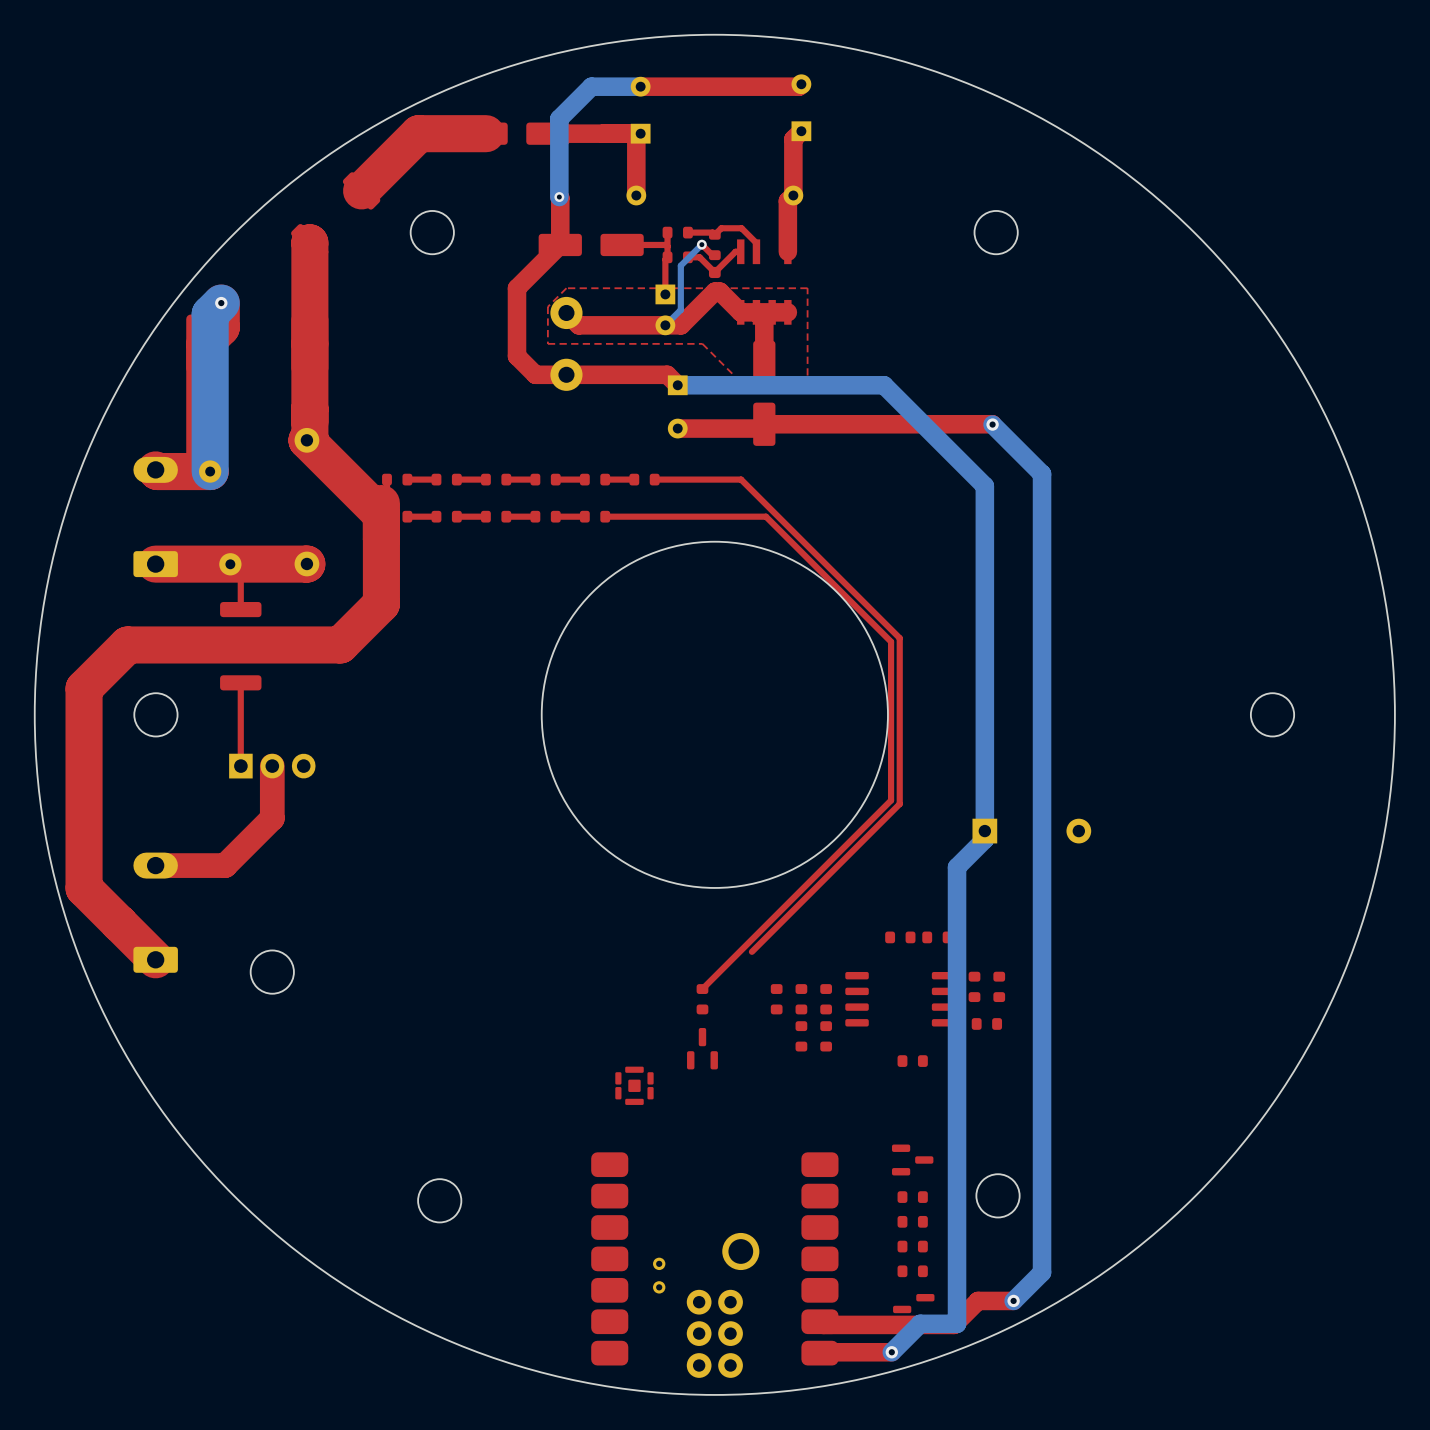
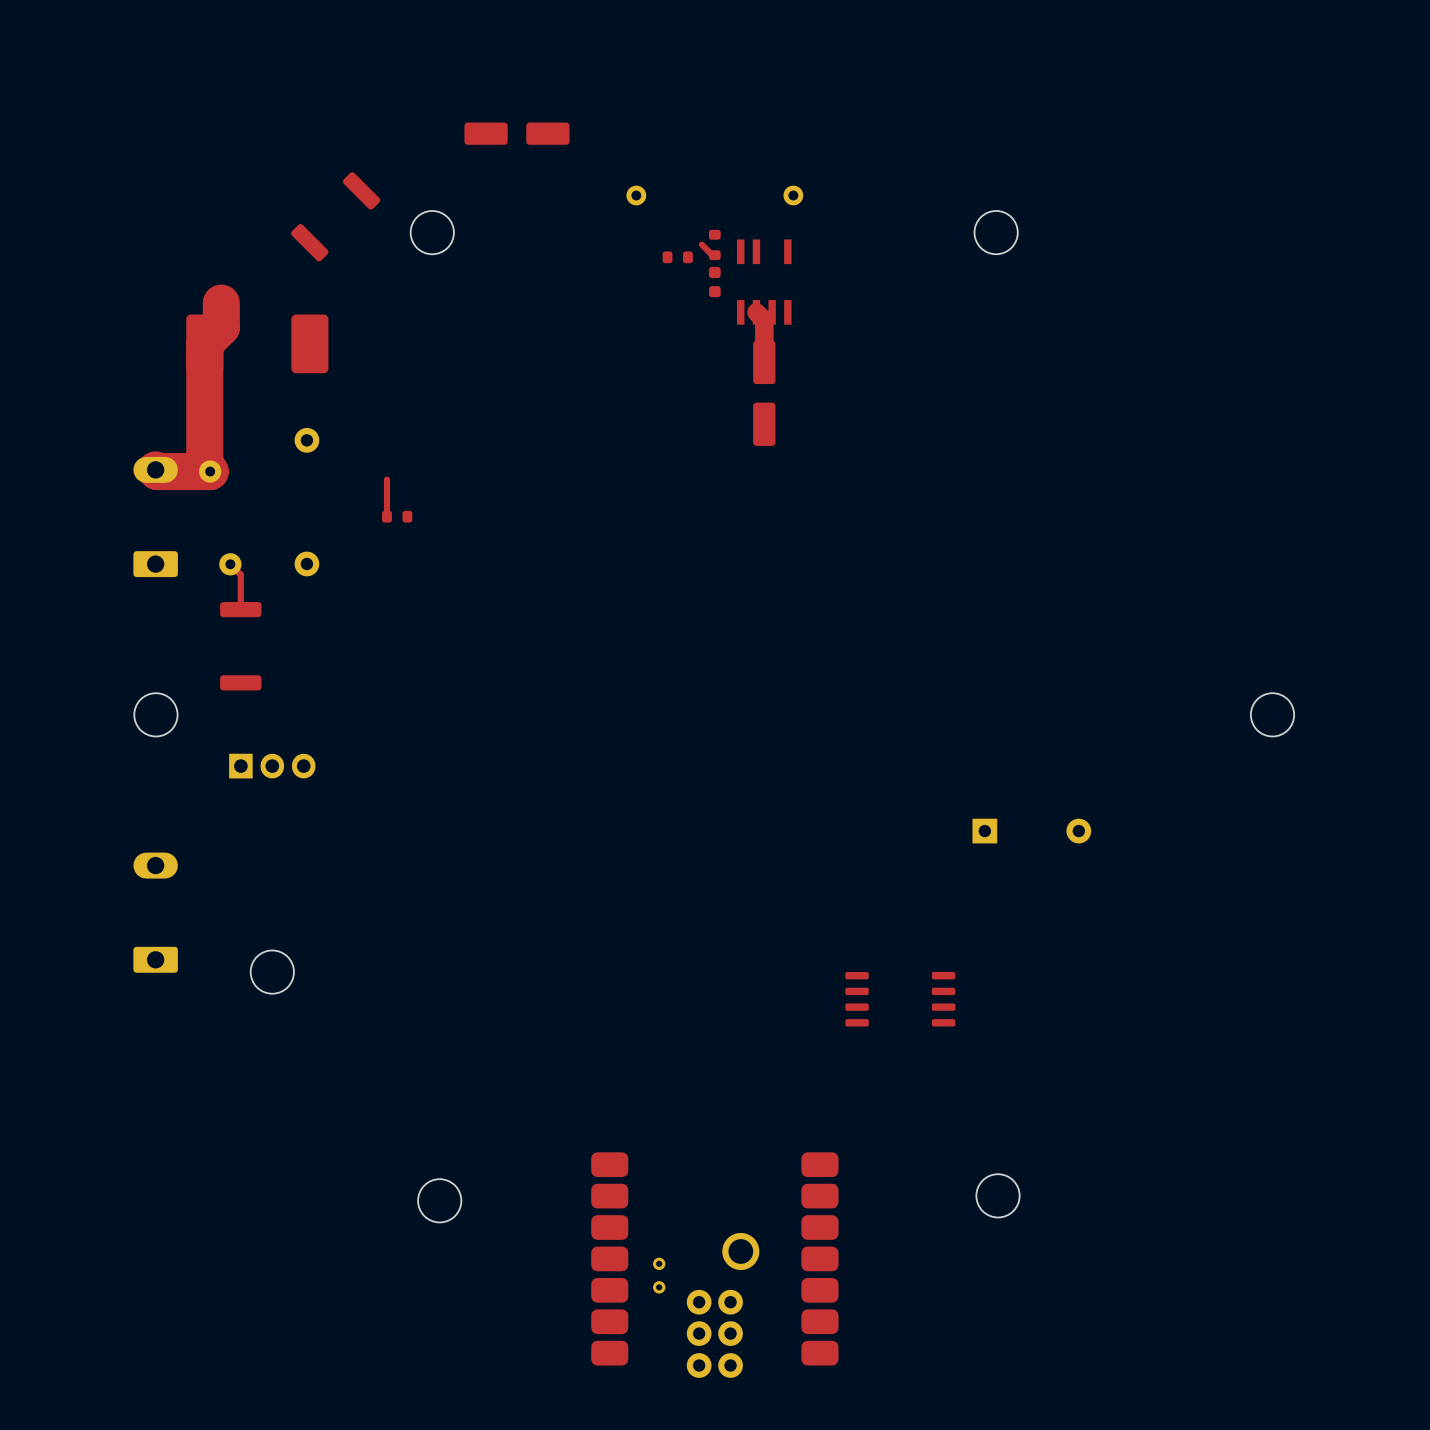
round board edge: [34, 34, 1396, 1396] -> none
top track: (801, 84) (798, 86) (640, 86) -> none
bottom track: (640, 86) (591, 86) (559, 118) (559, 197) -> none
part: (801, 107) -> none
part: (640, 110) -> none
top track: (801, 131) (793, 139) (793, 195) (787, 201) (787, 251) -> none
top track: (486, 133) (418, 133) (361, 190) -> none
top track: (547, 133) (640, 133) (636, 138) -> none
top track: (636, 138) (636, 195) -> none
top track: (559, 197) (560, 244) (517, 288) (517, 356) (535, 374) (667, 374) (677, 385) -> none
via: (559, 197) -> none
top track: (667, 232) (665, 294) -> none
part: (677, 232) -> none
top track: (687, 232) (712, 232) (714, 234) (721, 228) (741, 228) (756, 243) (756, 251) -> none
top track: (309, 242) (309, 437) (306, 440) (381, 514) -> none
part: (591, 244) -> none
top track: (622, 244) (667, 246) -> none
bottom track: (701, 244) (680, 265) (680, 309) (665, 325) -> none
via: (701, 244) -> none
top track: (740, 251) (735, 251) (714, 272) (699, 257) (687, 257) -> none
top zone outline: (807, 288) (566, 288) (547, 306) (547, 343) (702, 343) (745, 387) (807, 387) (807, 288) -> none
bottom track: (221, 303) (210, 314) (210, 471) -> none
via: (221, 303) -> none
part: (665, 309) -> none
top track: (787, 312) (740, 312) (720, 291) (714, 291) (681, 325) (578, 325) (566, 312) -> none
part: (566, 343) -> none
bottom track: (677, 385) (884, 385) (984, 486) (984, 839) (957, 867) (957, 1323) (920, 1323) (891, 1352) -> none
part: (677, 406) -> none
top track: (992, 424) (764, 424) (760, 428) (677, 428) -> none
bottom track: (992, 424) (1042, 474) (1042, 1272) (1013, 1300) -> none
via: (992, 424) -> none
part: (397, 479) -> none
top track: (436, 479) (407, 479) -> none
part: (446, 479) -> none
top track: (485, 479) (456, 479) -> none
part: (496, 479) -> none
top track: (535, 479) (506, 479) -> none
part: (545, 479) -> none
top track: (584, 479) (555, 479) -> none
part: (595, 479) -> none
top track: (634, 479) (605, 479) -> none
part: (644, 479) -> none
top track: (654, 479) (741, 479) (899, 638) (899, 804) (751, 951) -> none
top track: (381, 503) (381, 603) (340, 644) (127, 644) (84, 688) (84, 888) (155, 959) -> none
top track: (436, 516) (407, 516) -> none
part: (446, 516) -> none
top track: (485, 516) (456, 516) -> none
part: (496, 516) -> none
top track: (535, 516) (506, 516) -> none
part: (545, 516) -> none
top track: (584, 516) (555, 516) -> none
part: (595, 516) -> none
top track: (605, 516) (765, 516) (891, 641) (891, 800) (702, 989) -> none
round board edge: [541, 541, 889, 889] -> none
top track: (306, 564) (155, 564) -> none
top track: (240, 682) (240, 765) -> none
top track: (272, 766) (272, 818) (225, 865) (155, 865) -> none
part: (900, 937) -> none
part: (937, 937) -> none
part: (974, 986) -> none
part: (999, 986) -> none
part: (702, 999) -> none
part: (776, 999) -> none
part: (801, 999) -> none
part: (826, 999) -> none
part: (986, 1023) -> none
part: (801, 1036) -> none
part: (826, 1036) -> none
part: (702, 1048) -> none
part: (912, 1061) -> none
part: (634, 1085) -> none
part: (912, 1159) -> none
part: (912, 1197) -> none
part: (912, 1221) -> none
part: (912, 1246) -> none
part: (912, 1271) -> none
top track: (1013, 1300) (978, 1300) (954, 1324) (823, 1324) (819, 1321) -> none
via: (1013, 1300) -> none
part: (913, 1309) -> none
top track: (891, 1352) (819, 1353) -> none
via: (891, 1352) -> none

